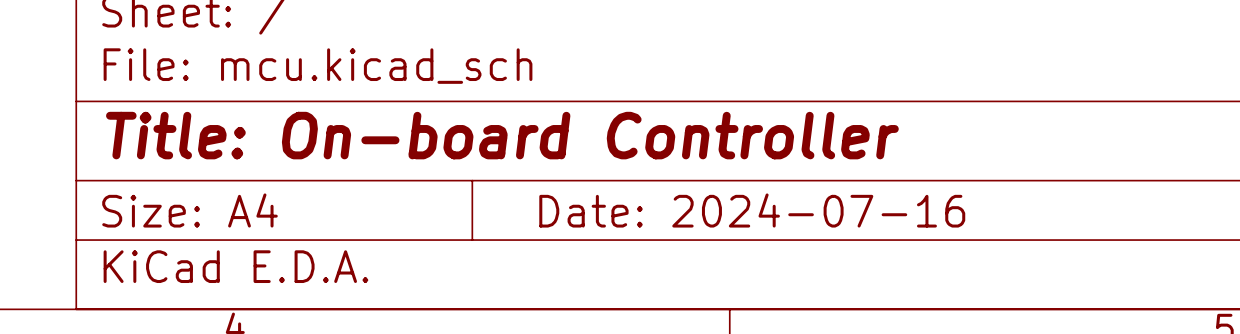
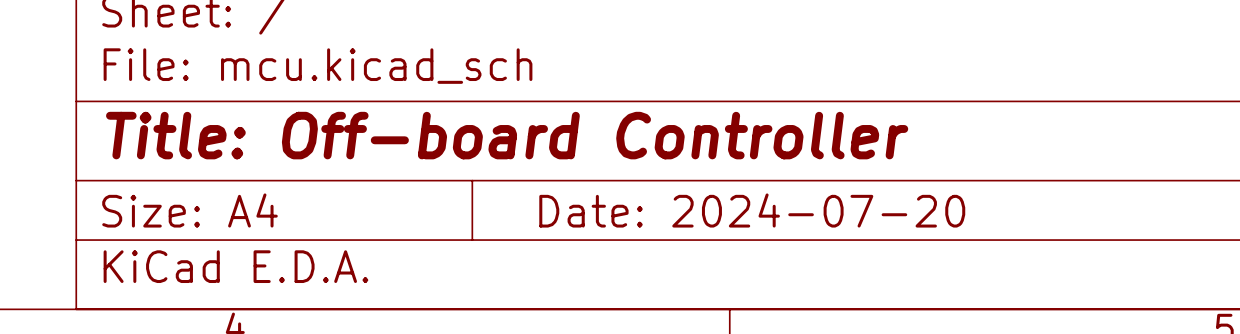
title block: Title: On-board Controller (502, 135) -> Title: Off-board Controller (507, 135)
title block: Date: 2024-07-16 (752, 210) -> Date: 2024-07-20 (752, 210)

